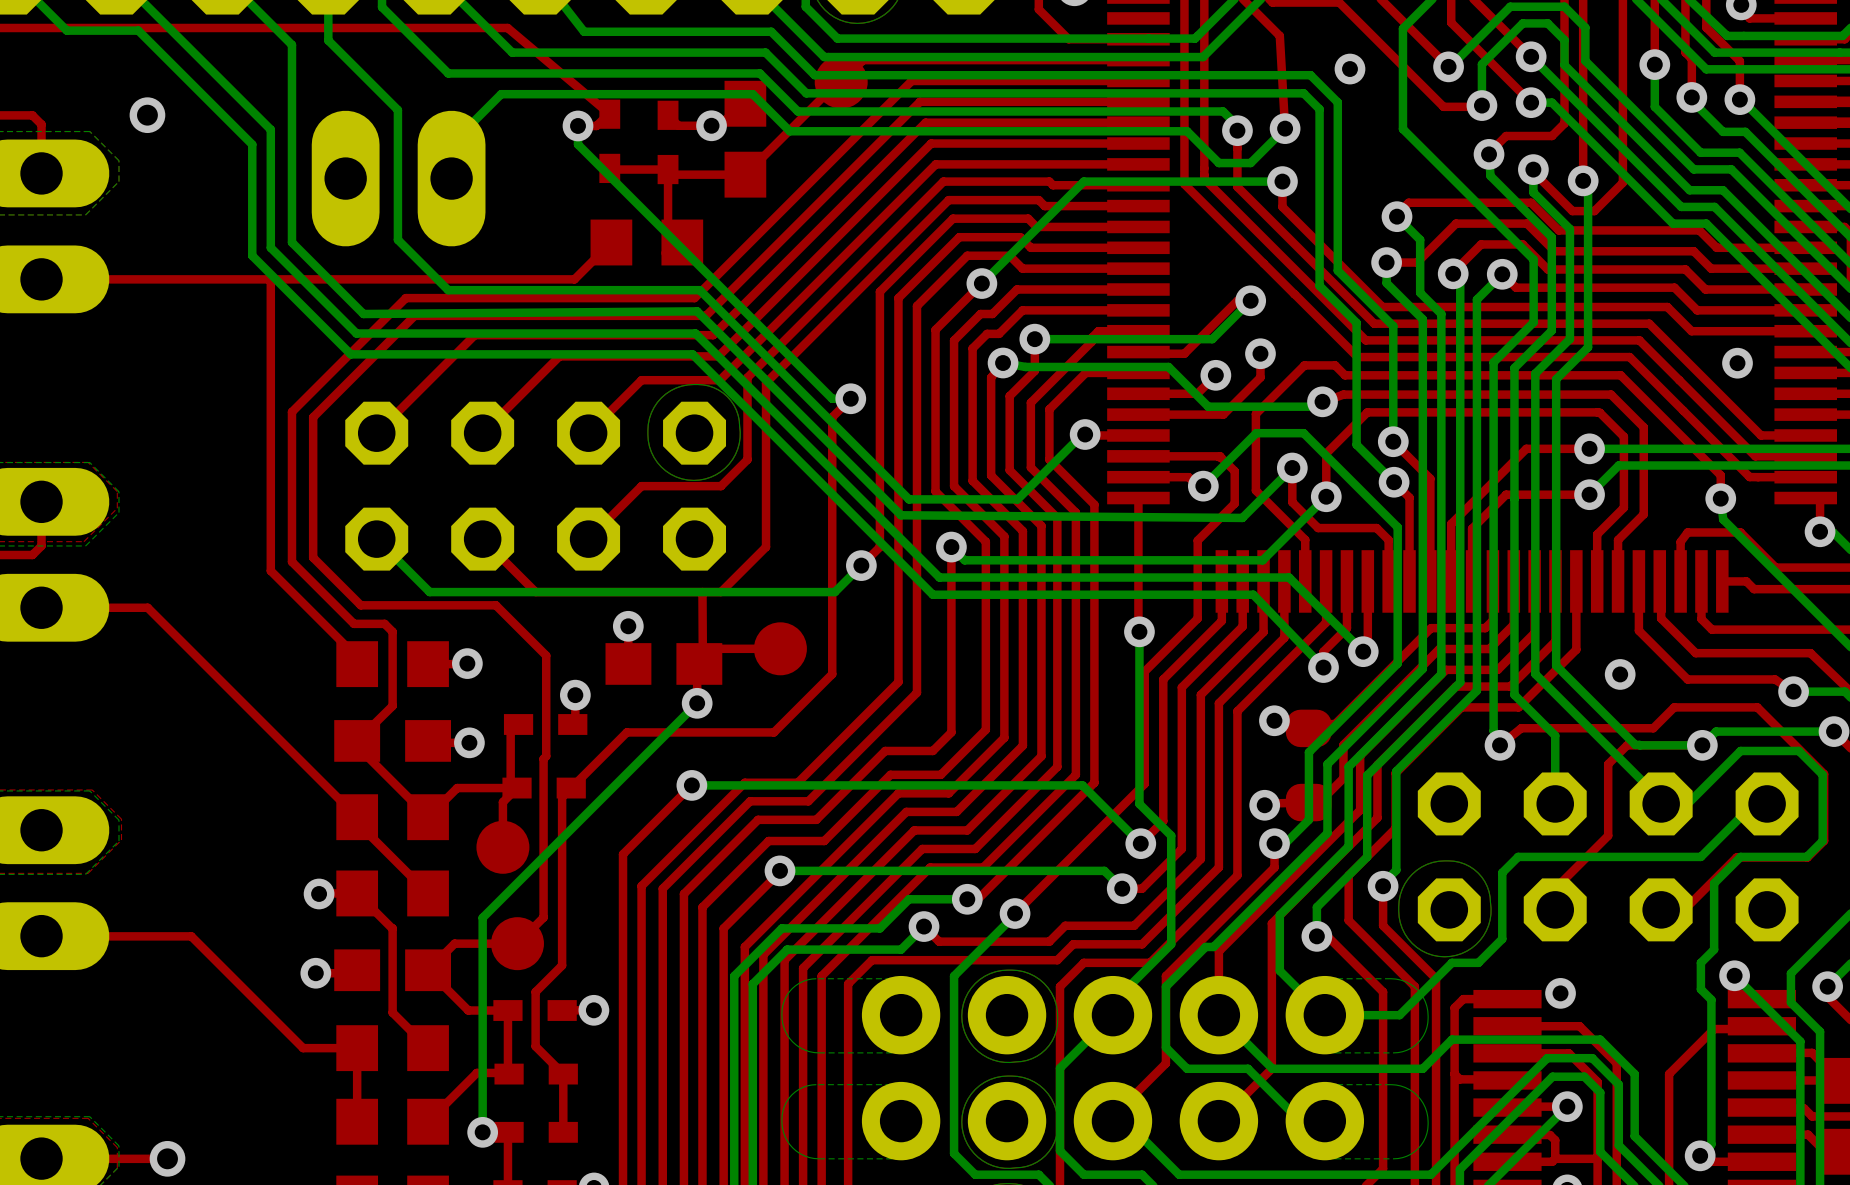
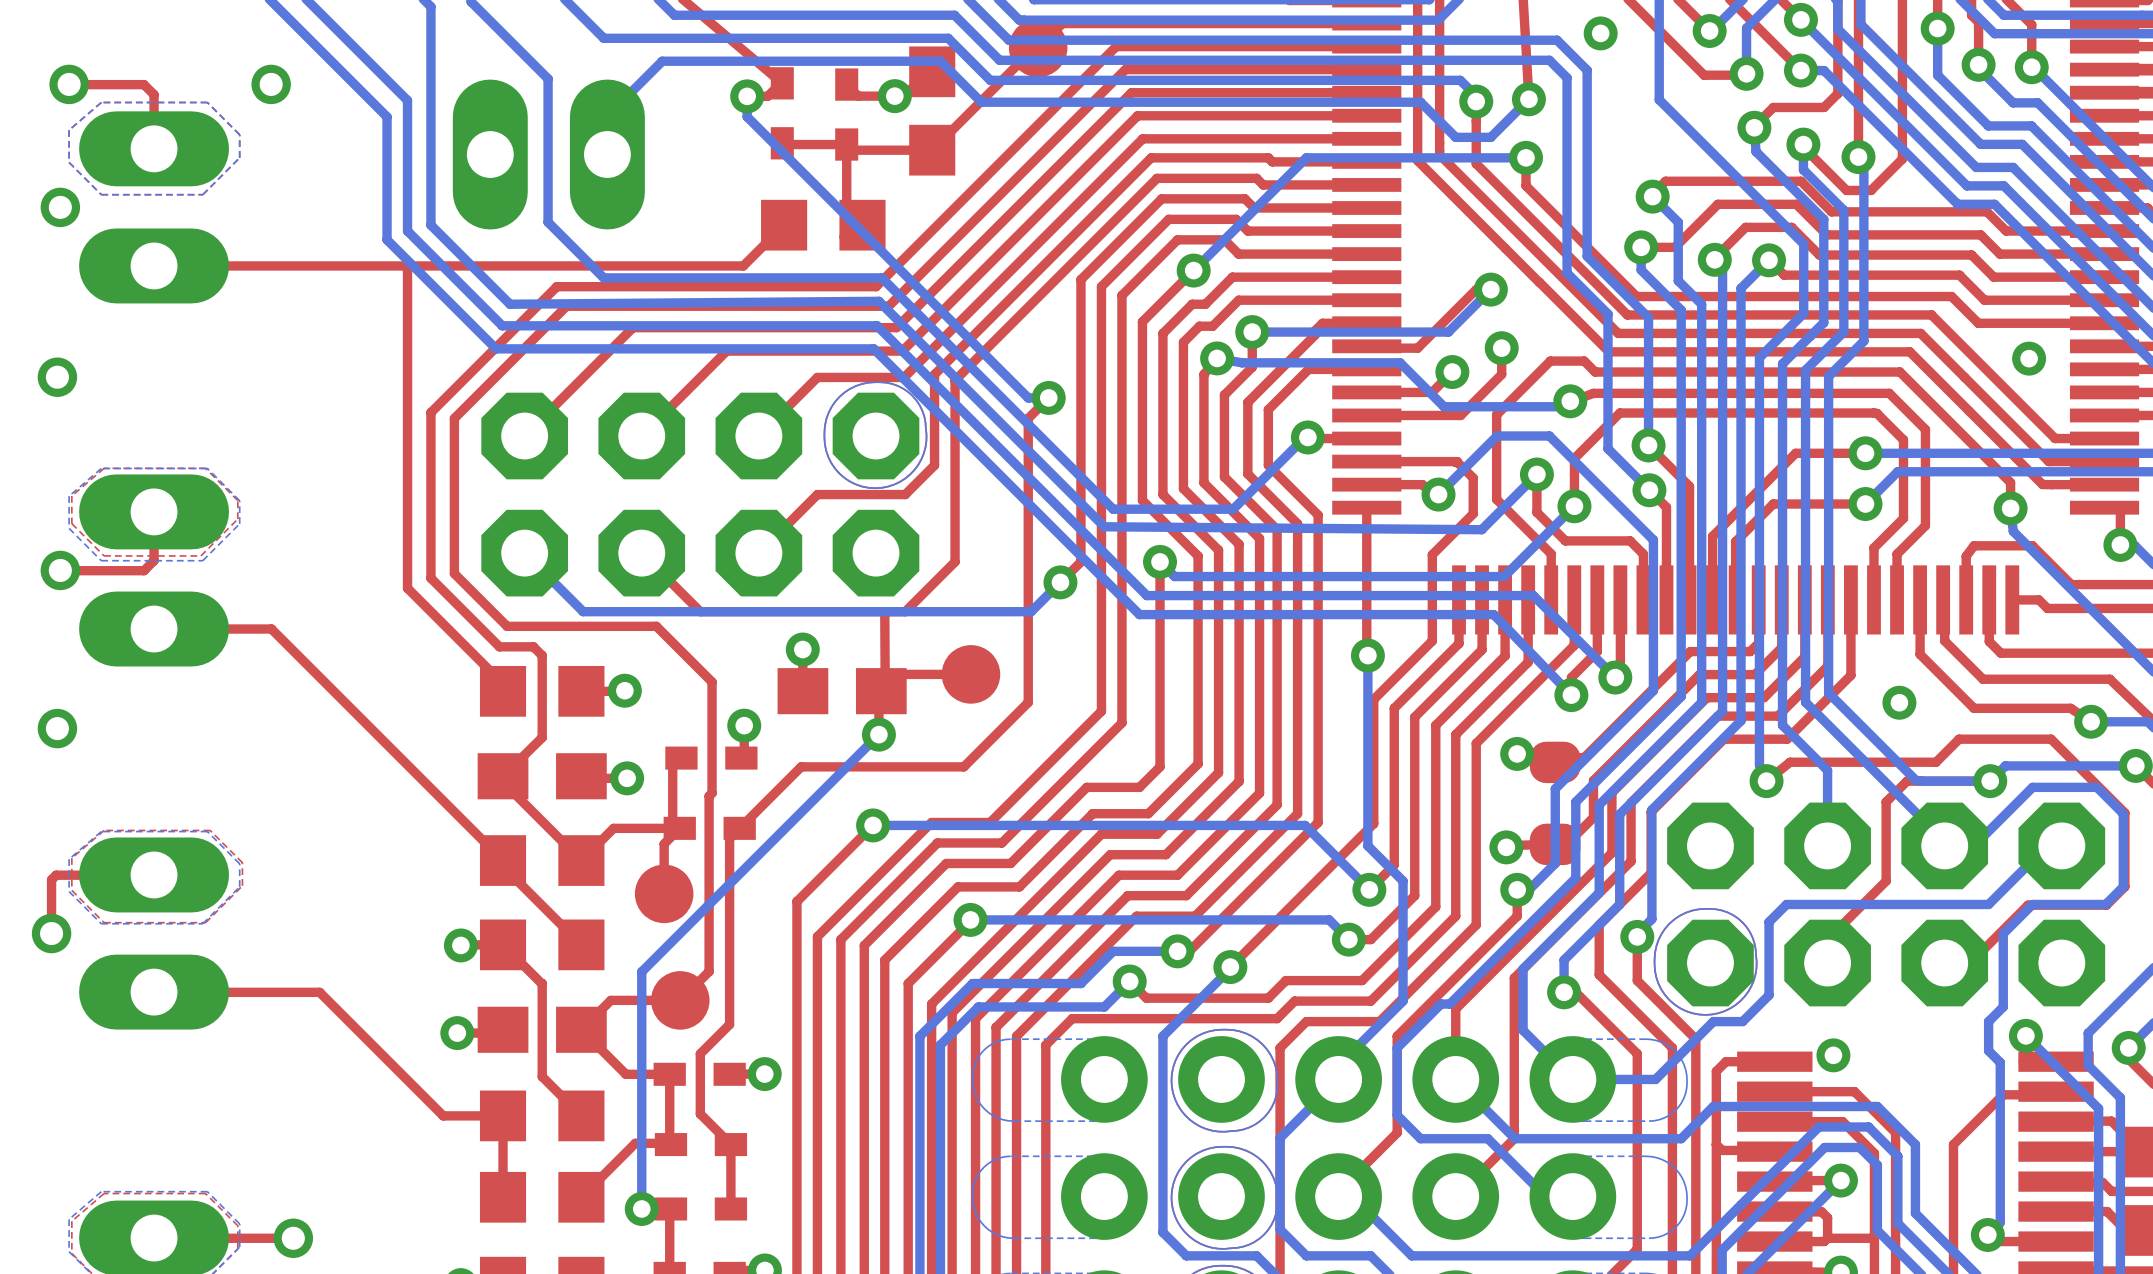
part footprint: [345, 401, 727, 571] -> [481, 392, 920, 597]
part footprint: [1417, 772, 1799, 942] -> [1667, 802, 2106, 1007]

